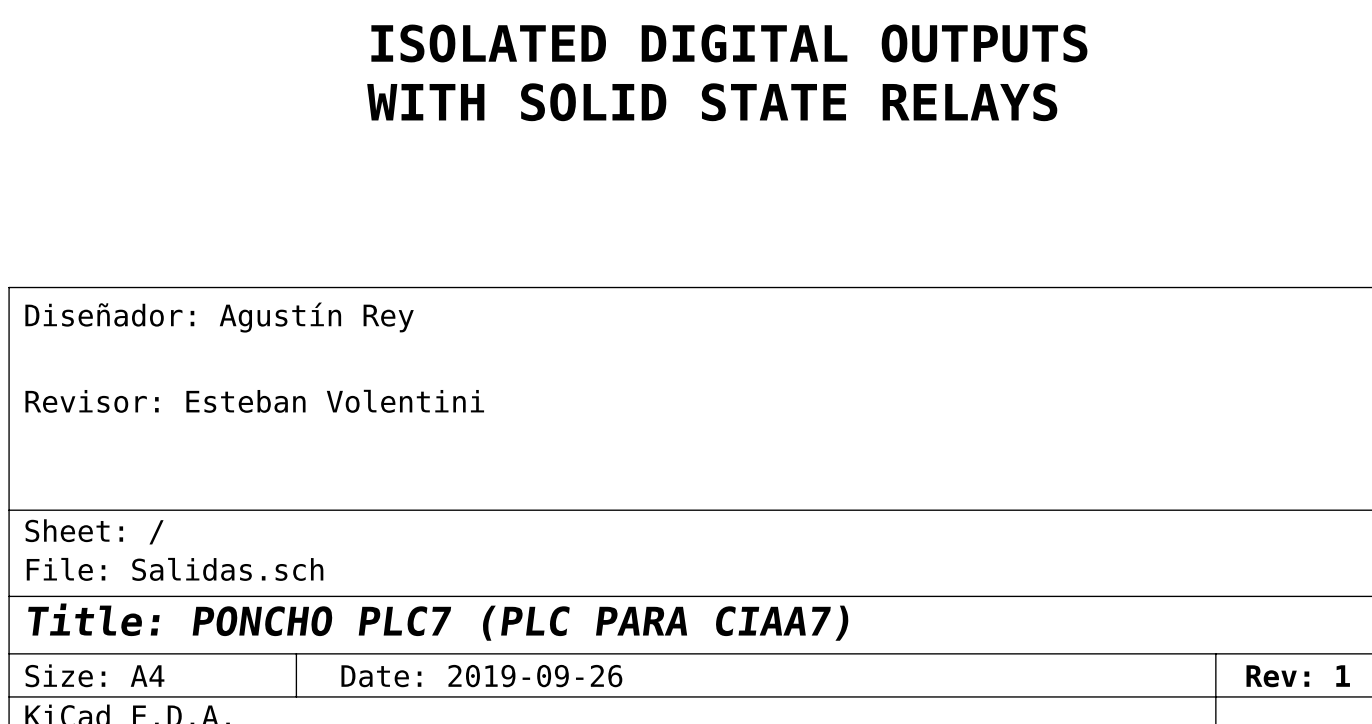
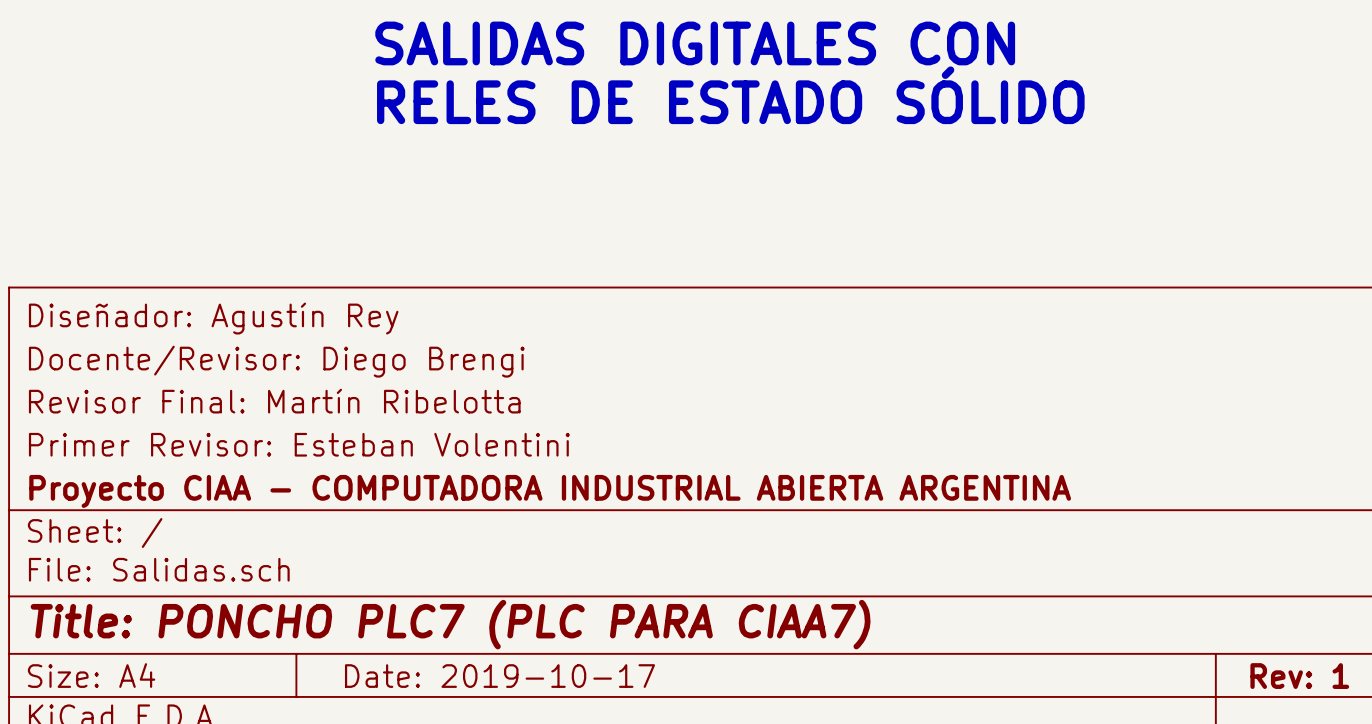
text: ISOLATED DIGITAL OUTPUTS (729, 43) -> SALIDAS DIGITALES CON (695, 43)
text: WITH SOLID STATE RELAYS (712, 102) -> RELES DE ESTADO SÓLIDO (730, 95)
title block: none -> Docente/Revisor: Diego Brengi (276, 361)
title block: Revisor: Esteban Volentini (254, 401) -> Revisor Final: Martín Ribelotta (274, 401)
title block: none -> Primer Revisor: Esteban Volentini (299, 444)
title block: none -> Proyecto CIAA - COMPUTADORA INDUSTRIAL ABIERTA ARGENTINA (550, 491)
title block: Date: 2019-09-26 (481, 676) -> Date: 2019-10-17 (499, 676)

